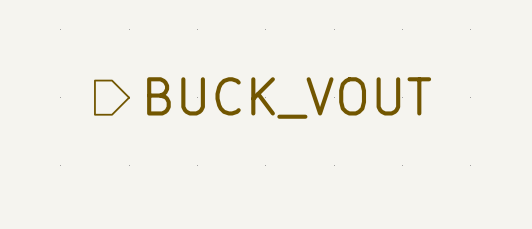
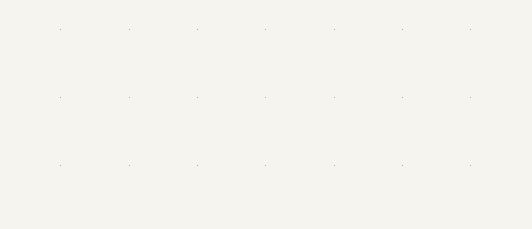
hierarchical label: BUCK_VOUT (289, 98) -> none

